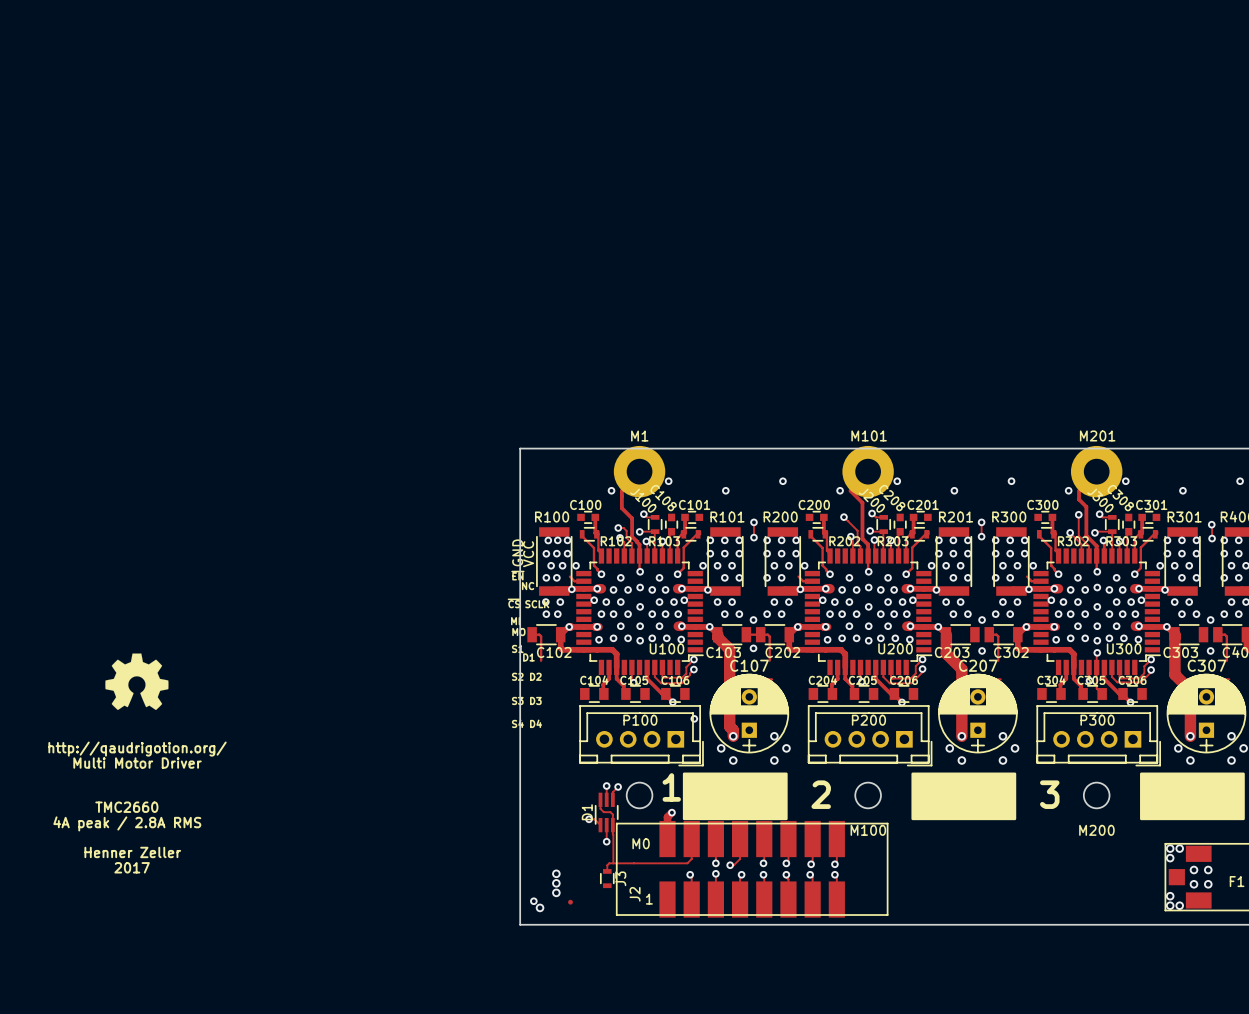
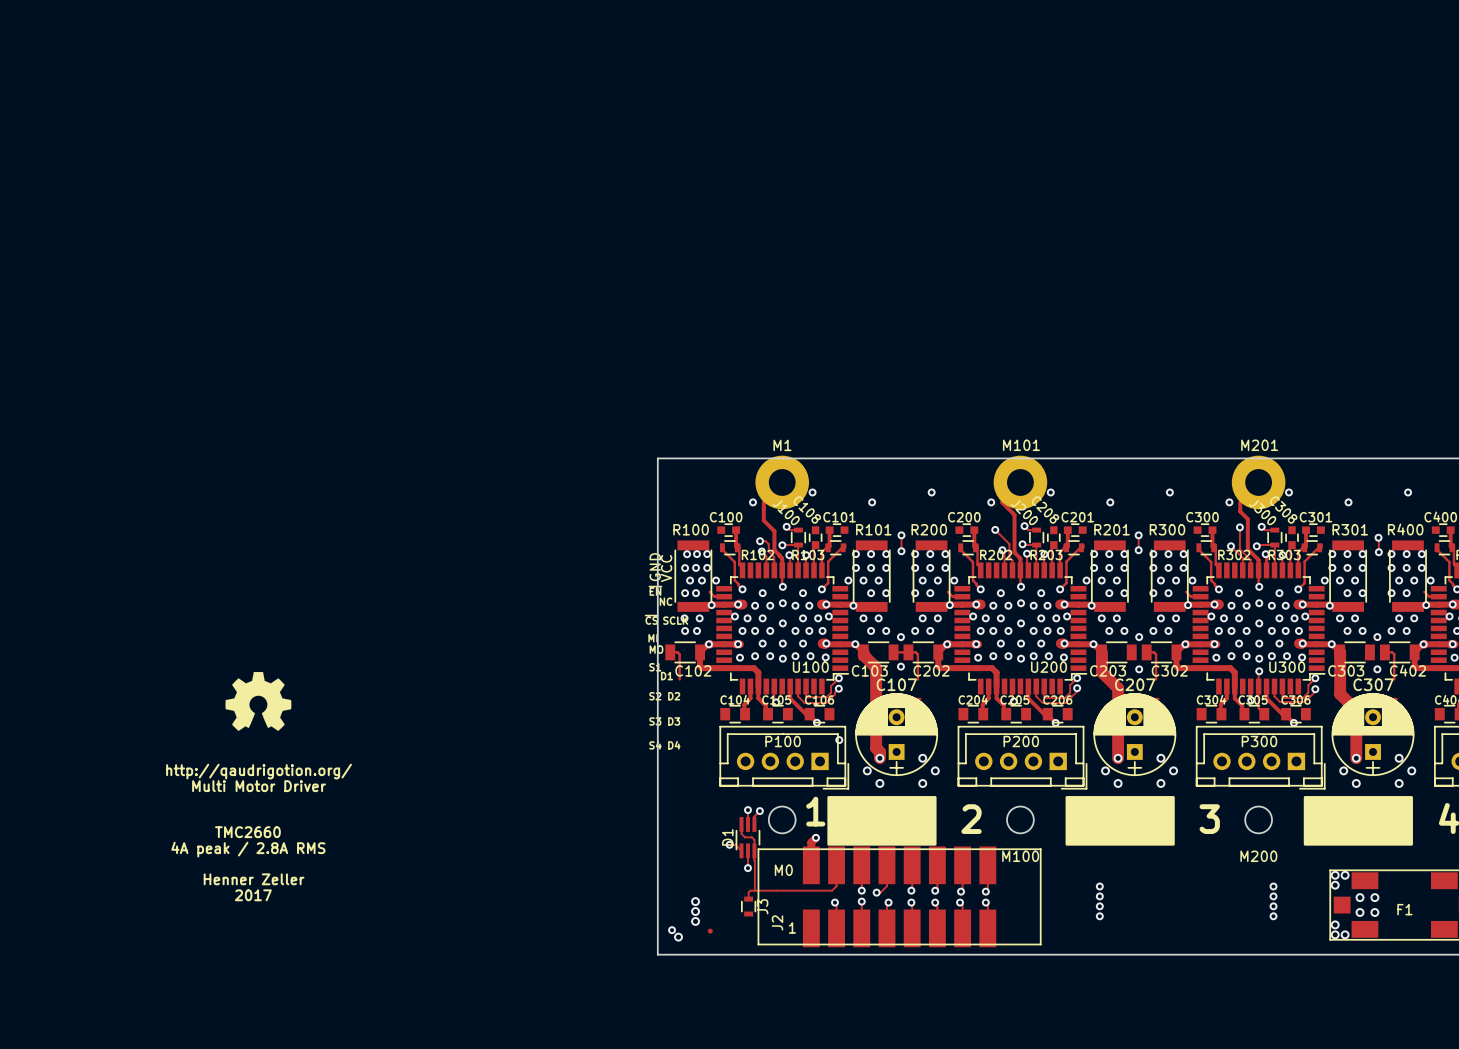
via: none -> (1099, 886)
via: none -> (1273, 886)
via: none -> (1099, 896)
via: none -> (1273, 896)
via: none -> (1099, 906)
via: none -> (1273, 906)
via: none -> (1099, 916)
via: none -> (1273, 916)

